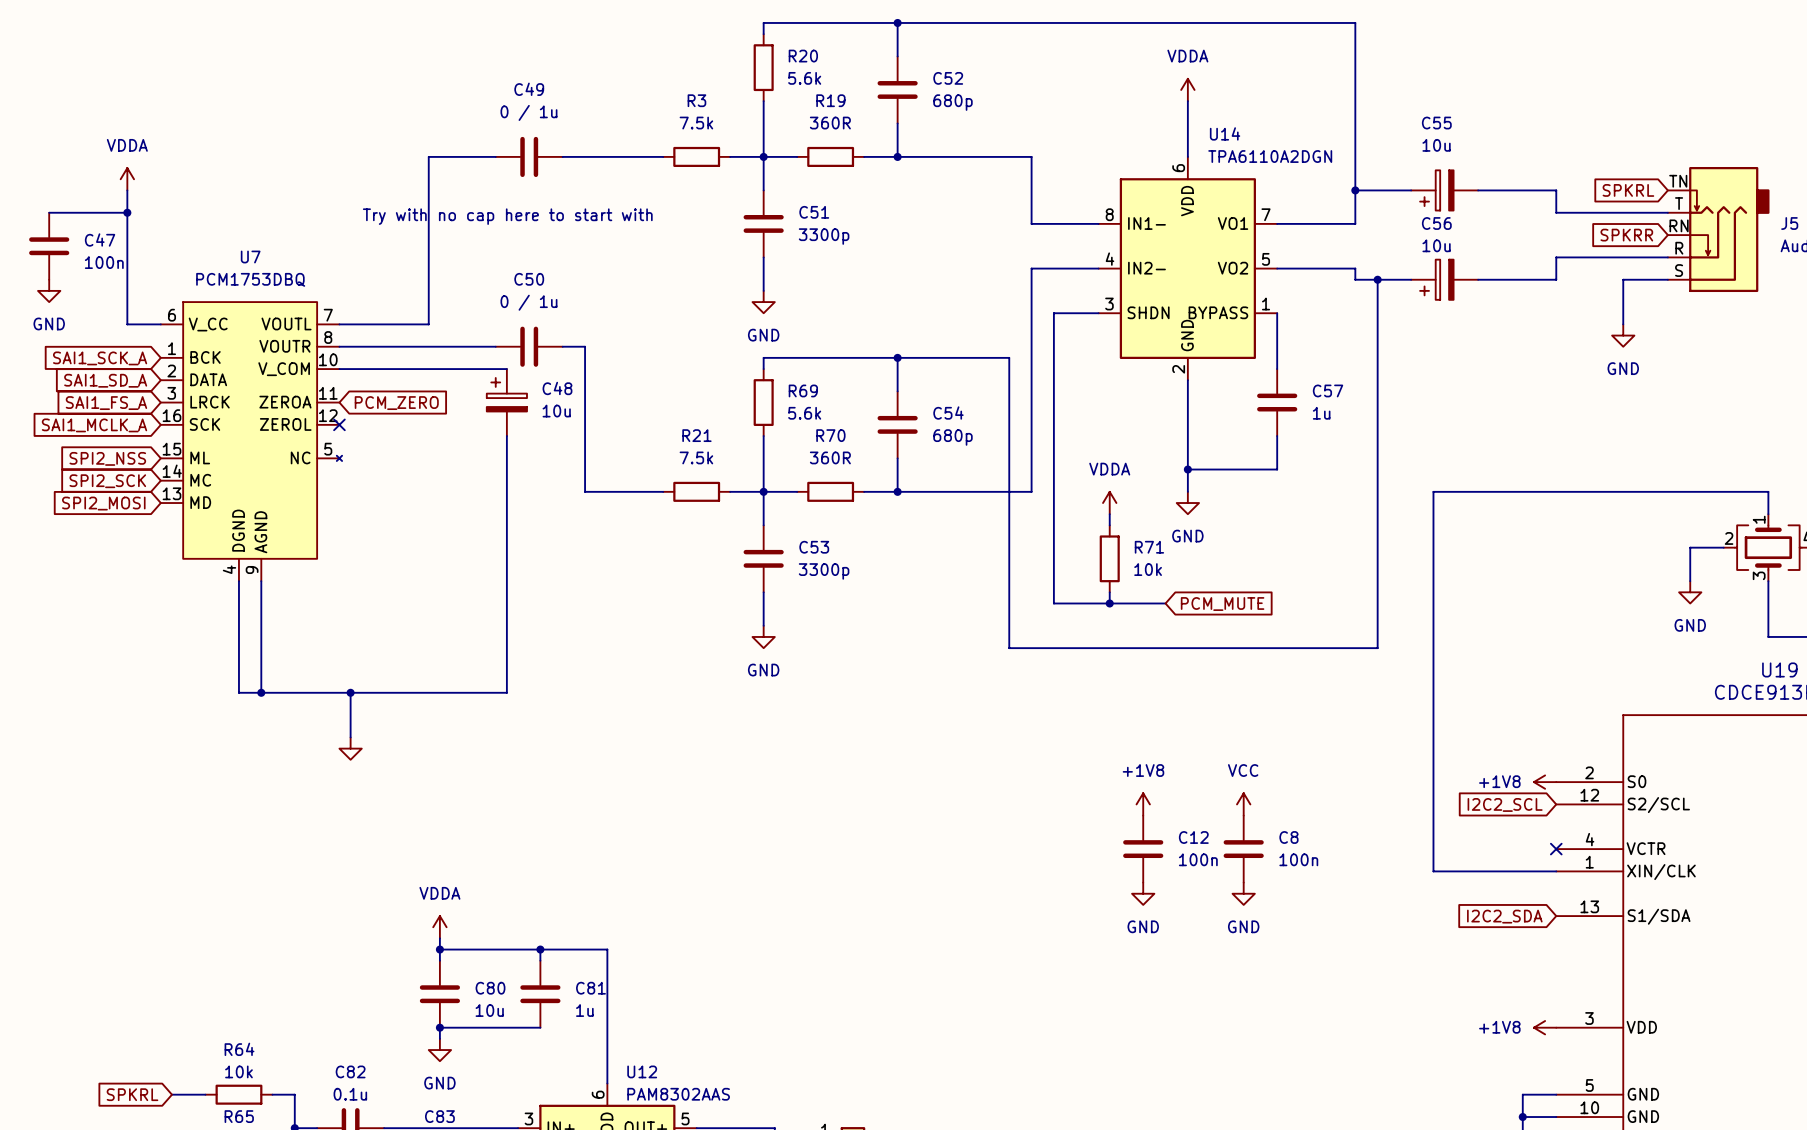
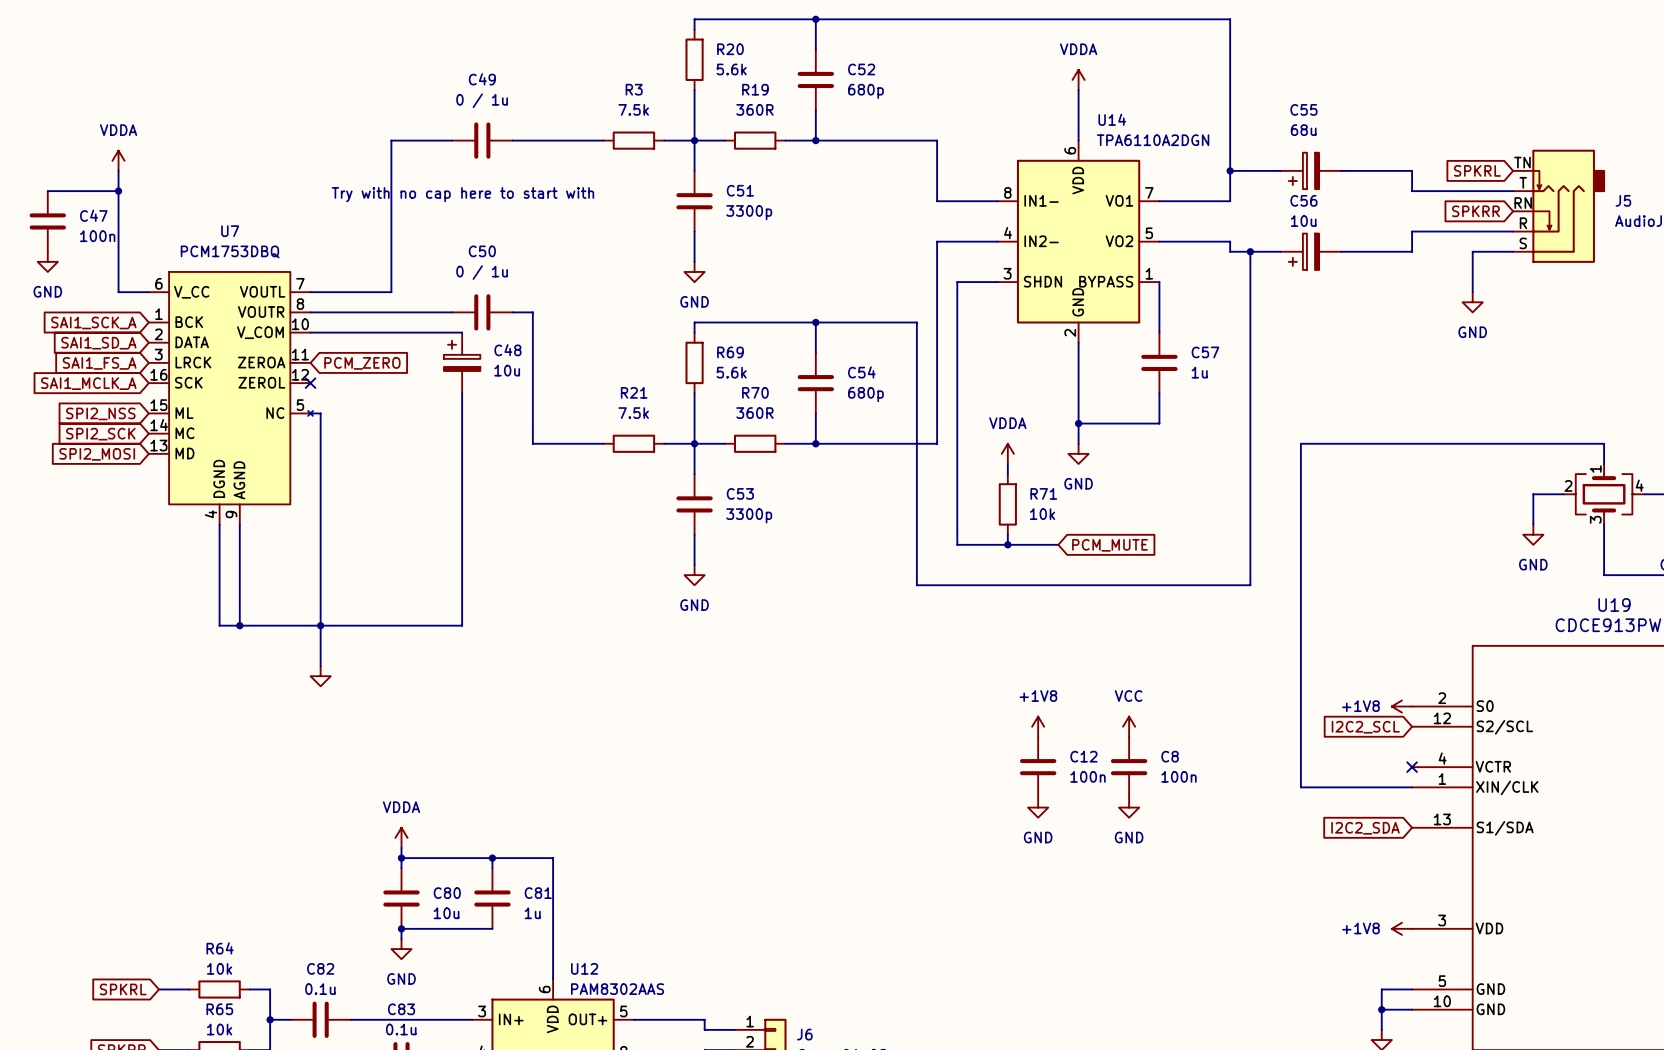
C55 value: 10u (1436, 145) -> 68u (1303, 130)
wire: none -> (310, 413) (320, 413) (320, 625)

